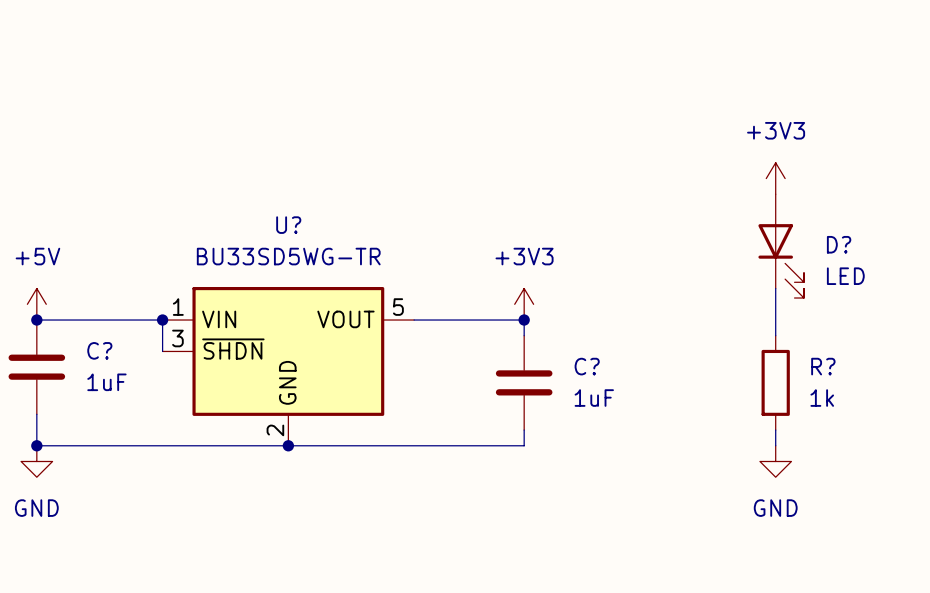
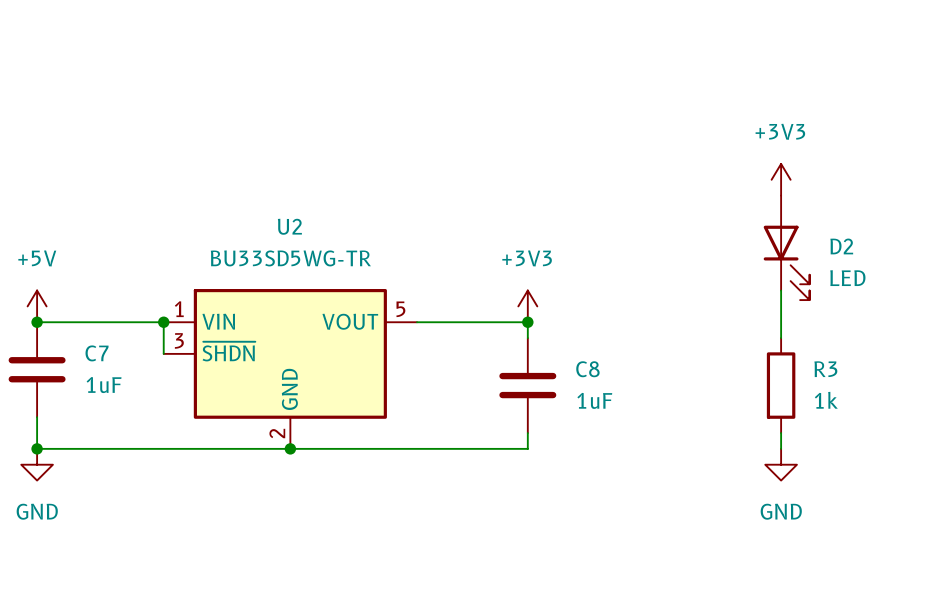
U? name: U? (288, 225) -> U2 (289, 226)
D? name: D? (839, 244) -> D2 (841, 246)
C? name: C? (99, 350) -> C7 (97, 353)
C? name: C? (587, 366) -> C8 (587, 369)
R? name: R? (823, 366) -> R3 (825, 369)

